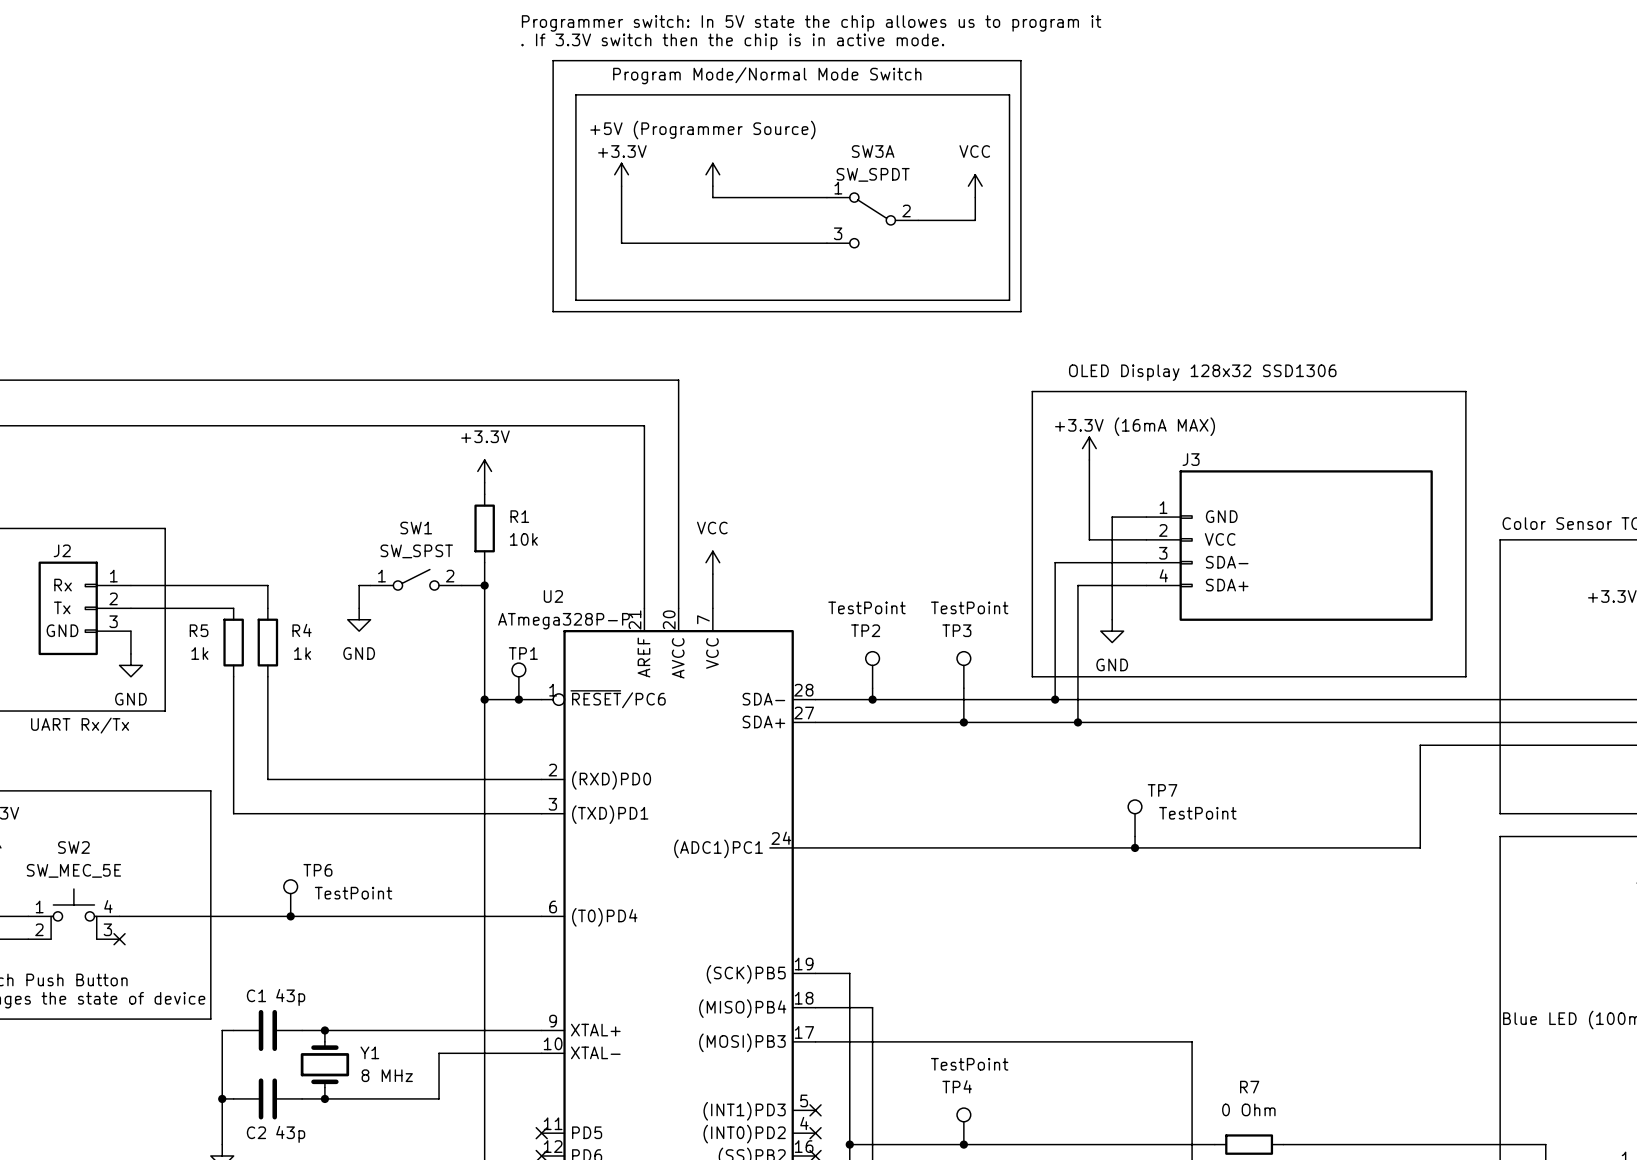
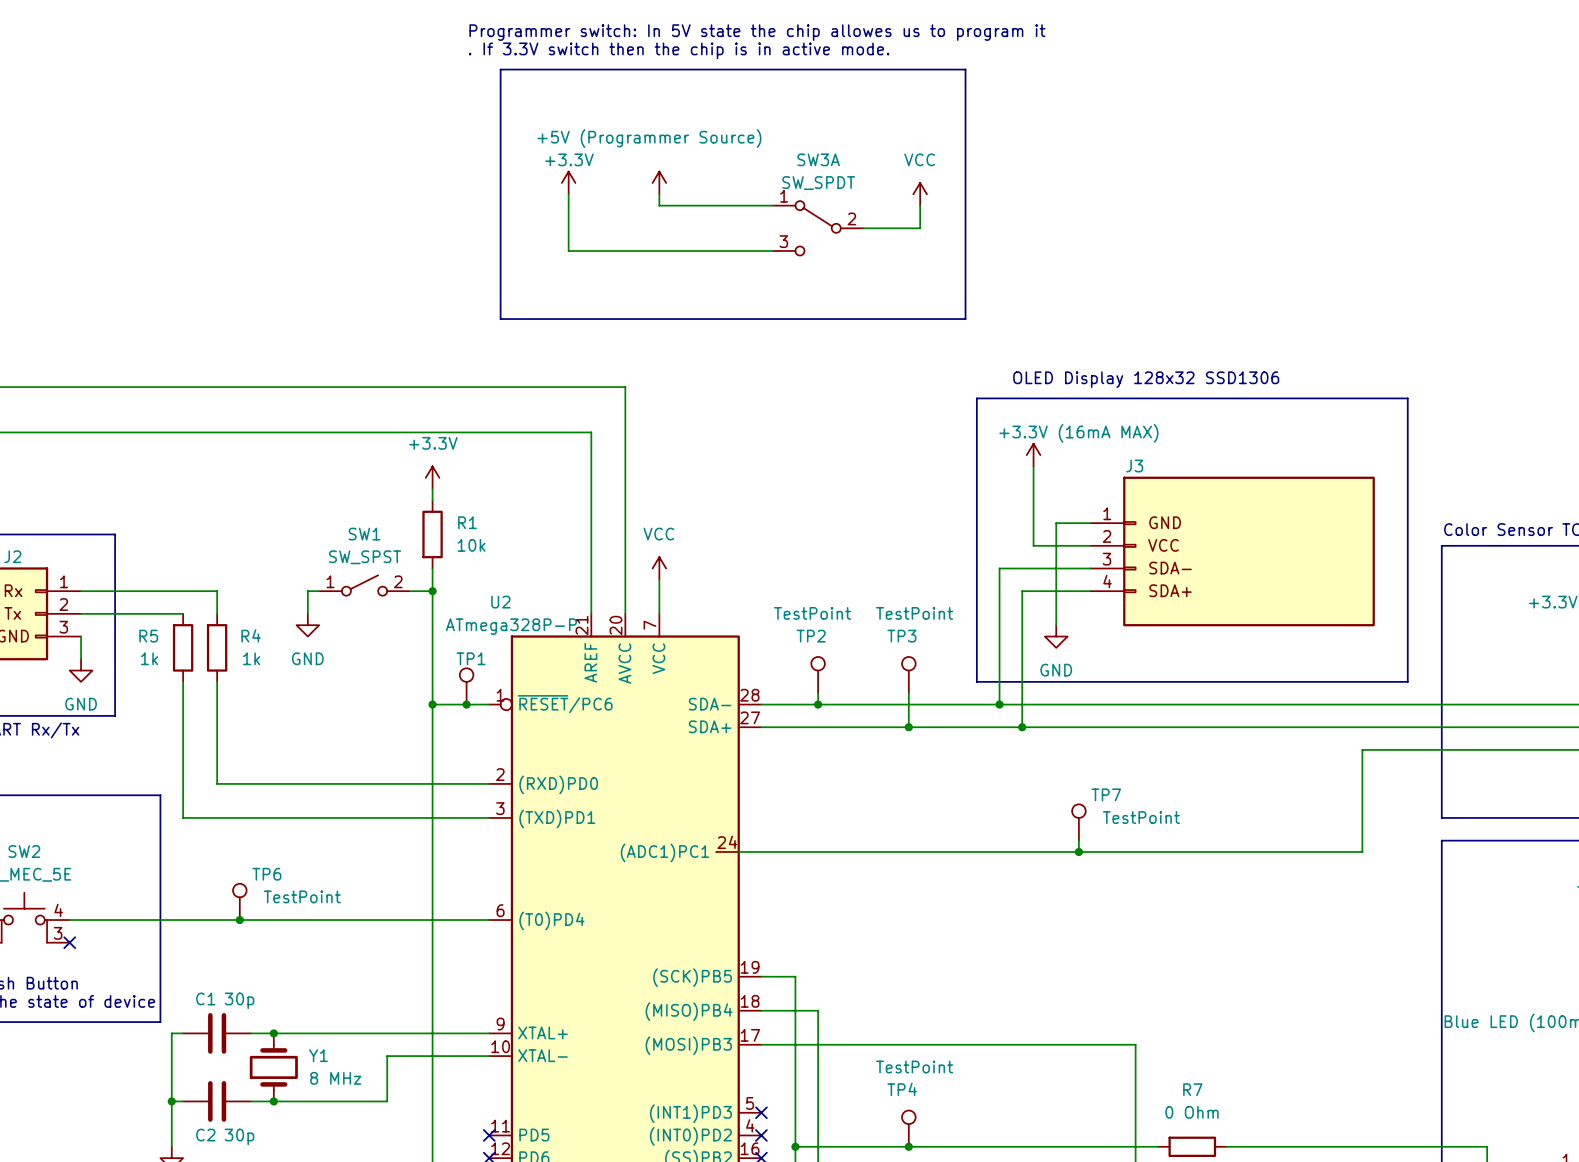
text: Program Mode/Normal Mode Switch (767, 75) -> none
line: (575, 94) (1009, 94) (1009, 300) (575, 300) (575, 94) -> none
C1 value: 43p (290, 997) -> 30p (239, 1000)
C2 value: 43p (290, 1134) -> 30p (239, 1136)

